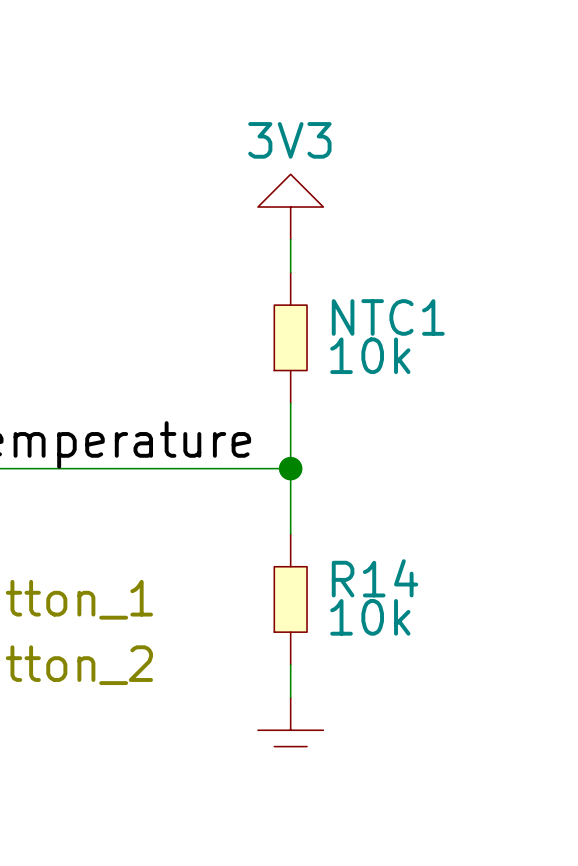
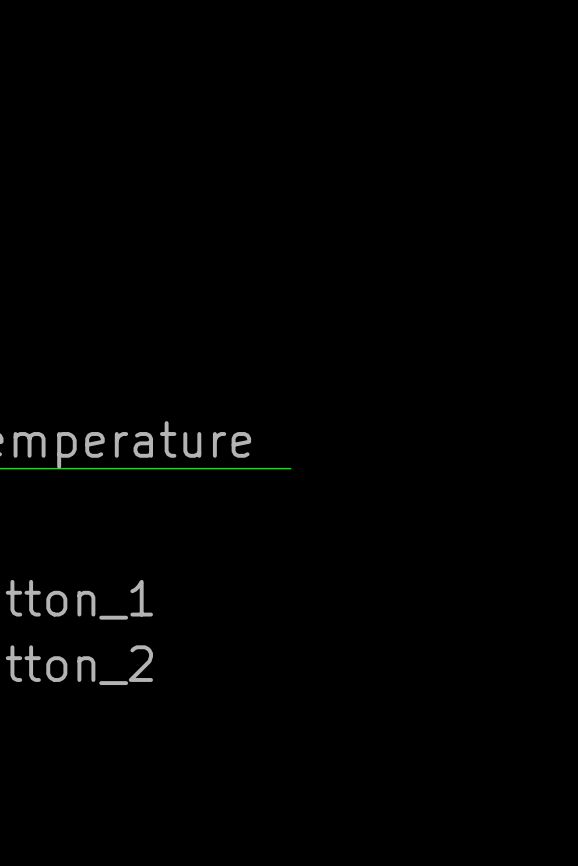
power symbol: 3V3 (290, 207) -> none
wire: (290, 239) (290, 272) -> none
NTC1: 10k (290, 337) -> none
wire: (290, 403) (290, 534) -> none
junction: (290, 468) -> none
R14: 10k (290, 599) -> none
wire: (290, 664) (290, 697) -> none
power symbol: (290, 730) -> none

